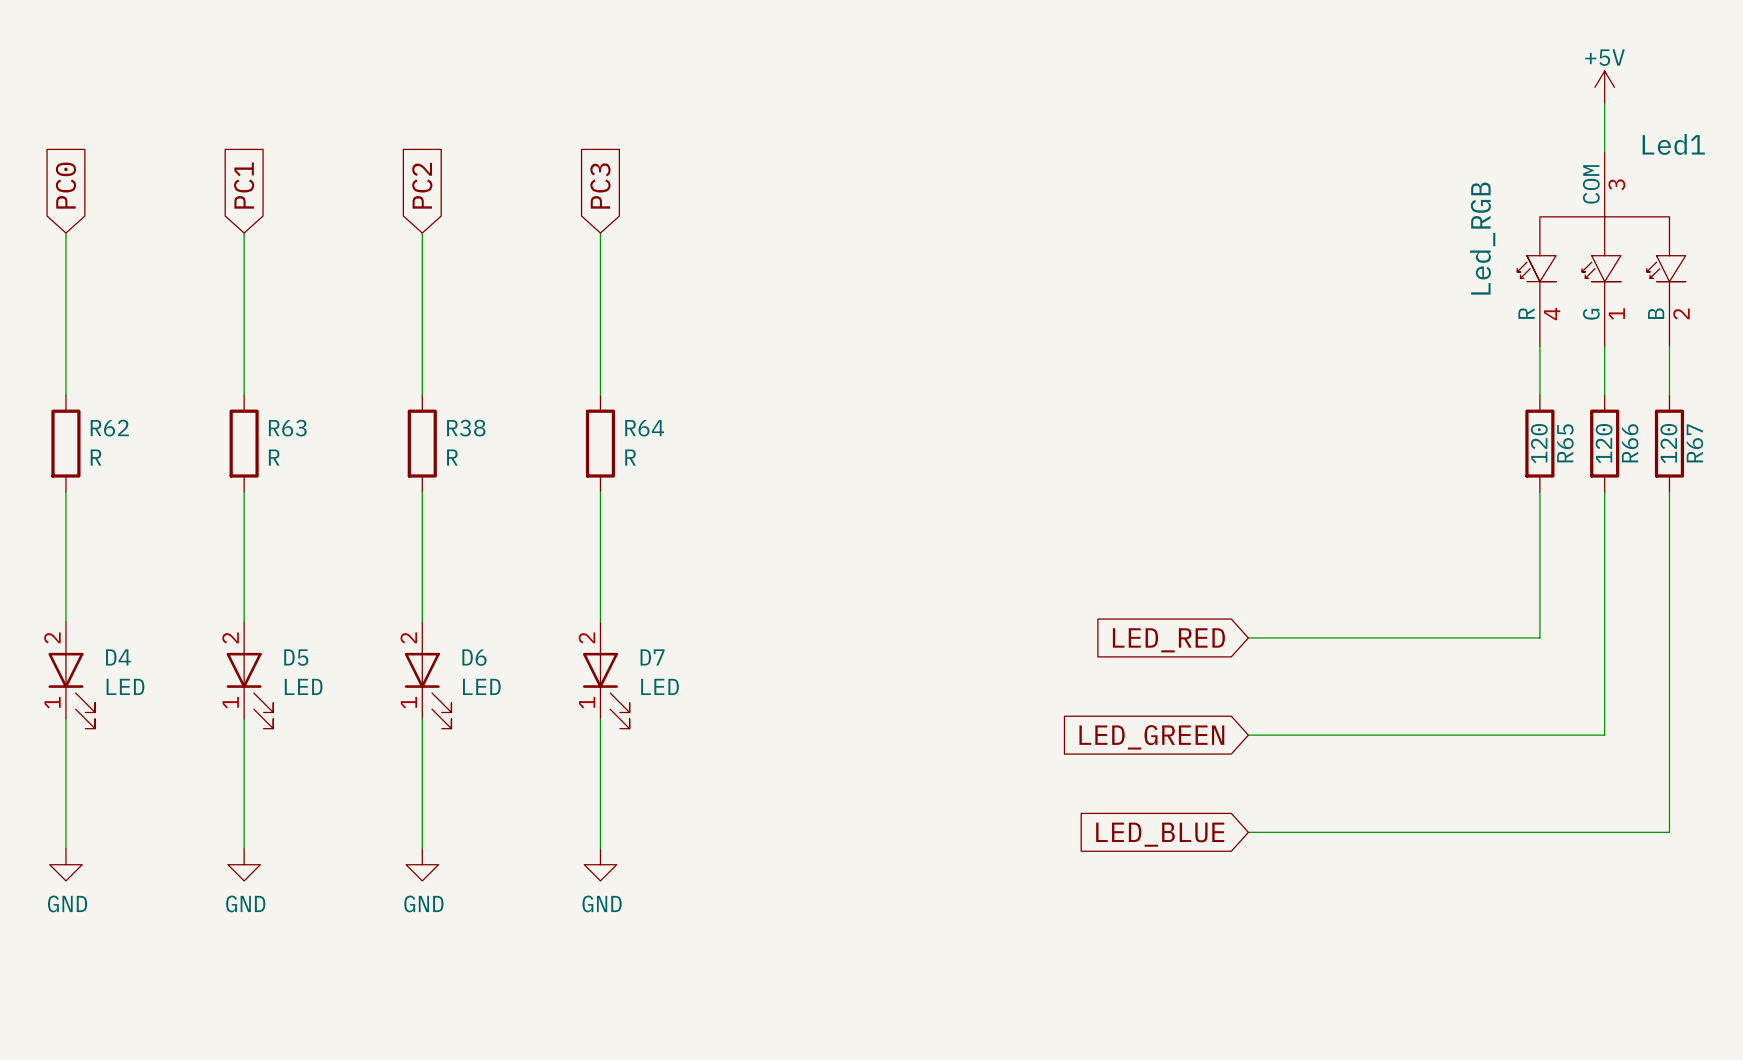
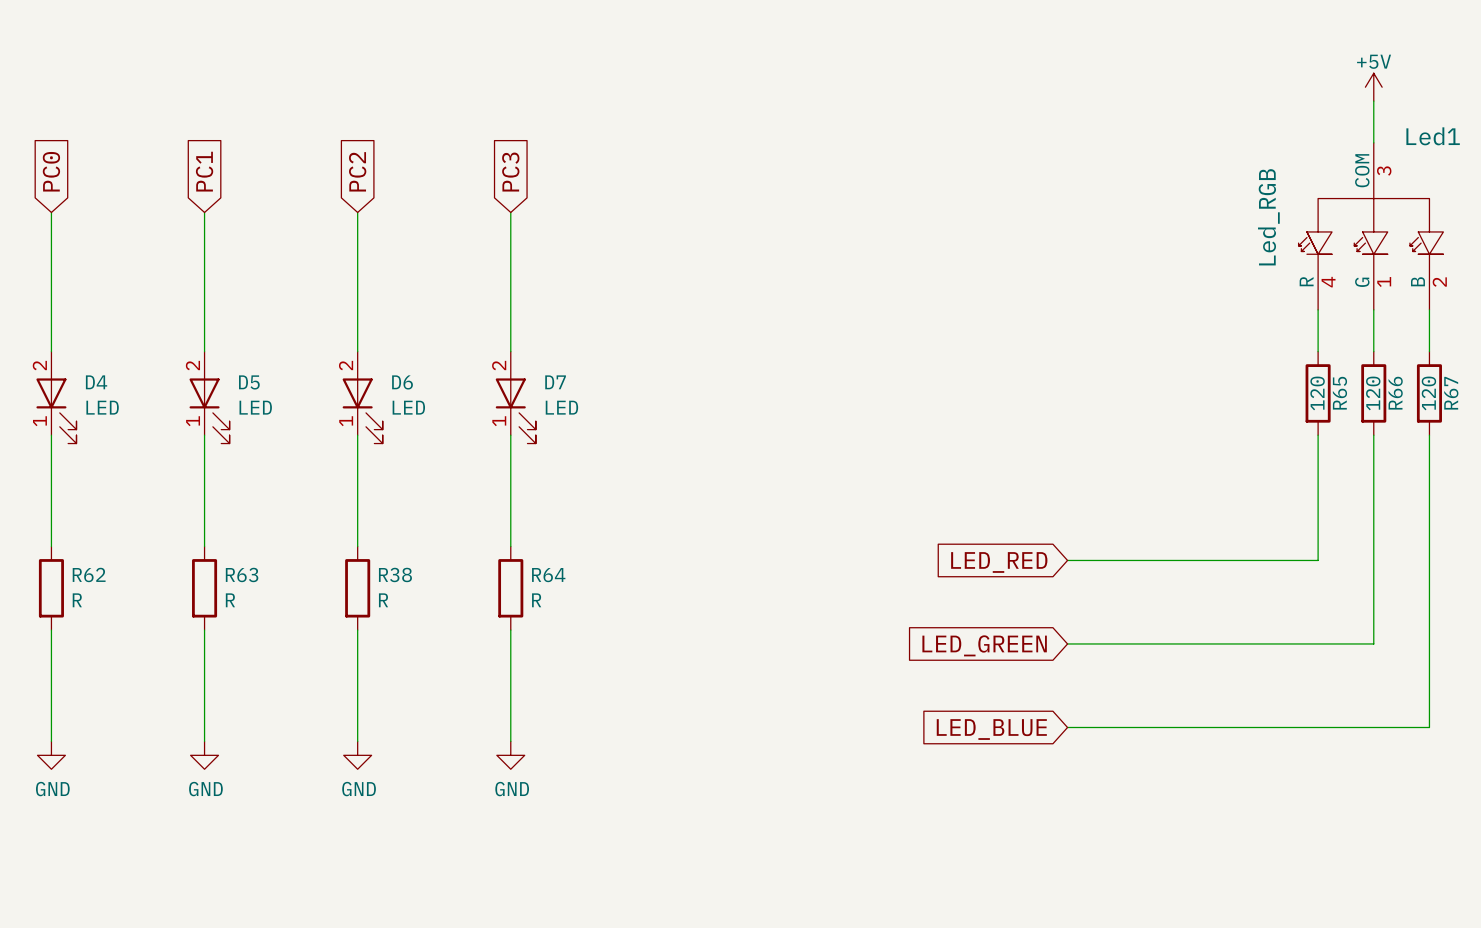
R62 position: (65, 443) -> (51, 588)
R63 position: (244, 443) -> (204, 588)
R38 position: (422, 443) -> (357, 588)
R64 position: (600, 443) -> (510, 588)
D4 position: (71, 675) -> (56, 397)
D5 position: (249, 675) -> (209, 397)
D6 position: (428, 675) -> (362, 397)
D7 position: (606, 675) -> (515, 397)

